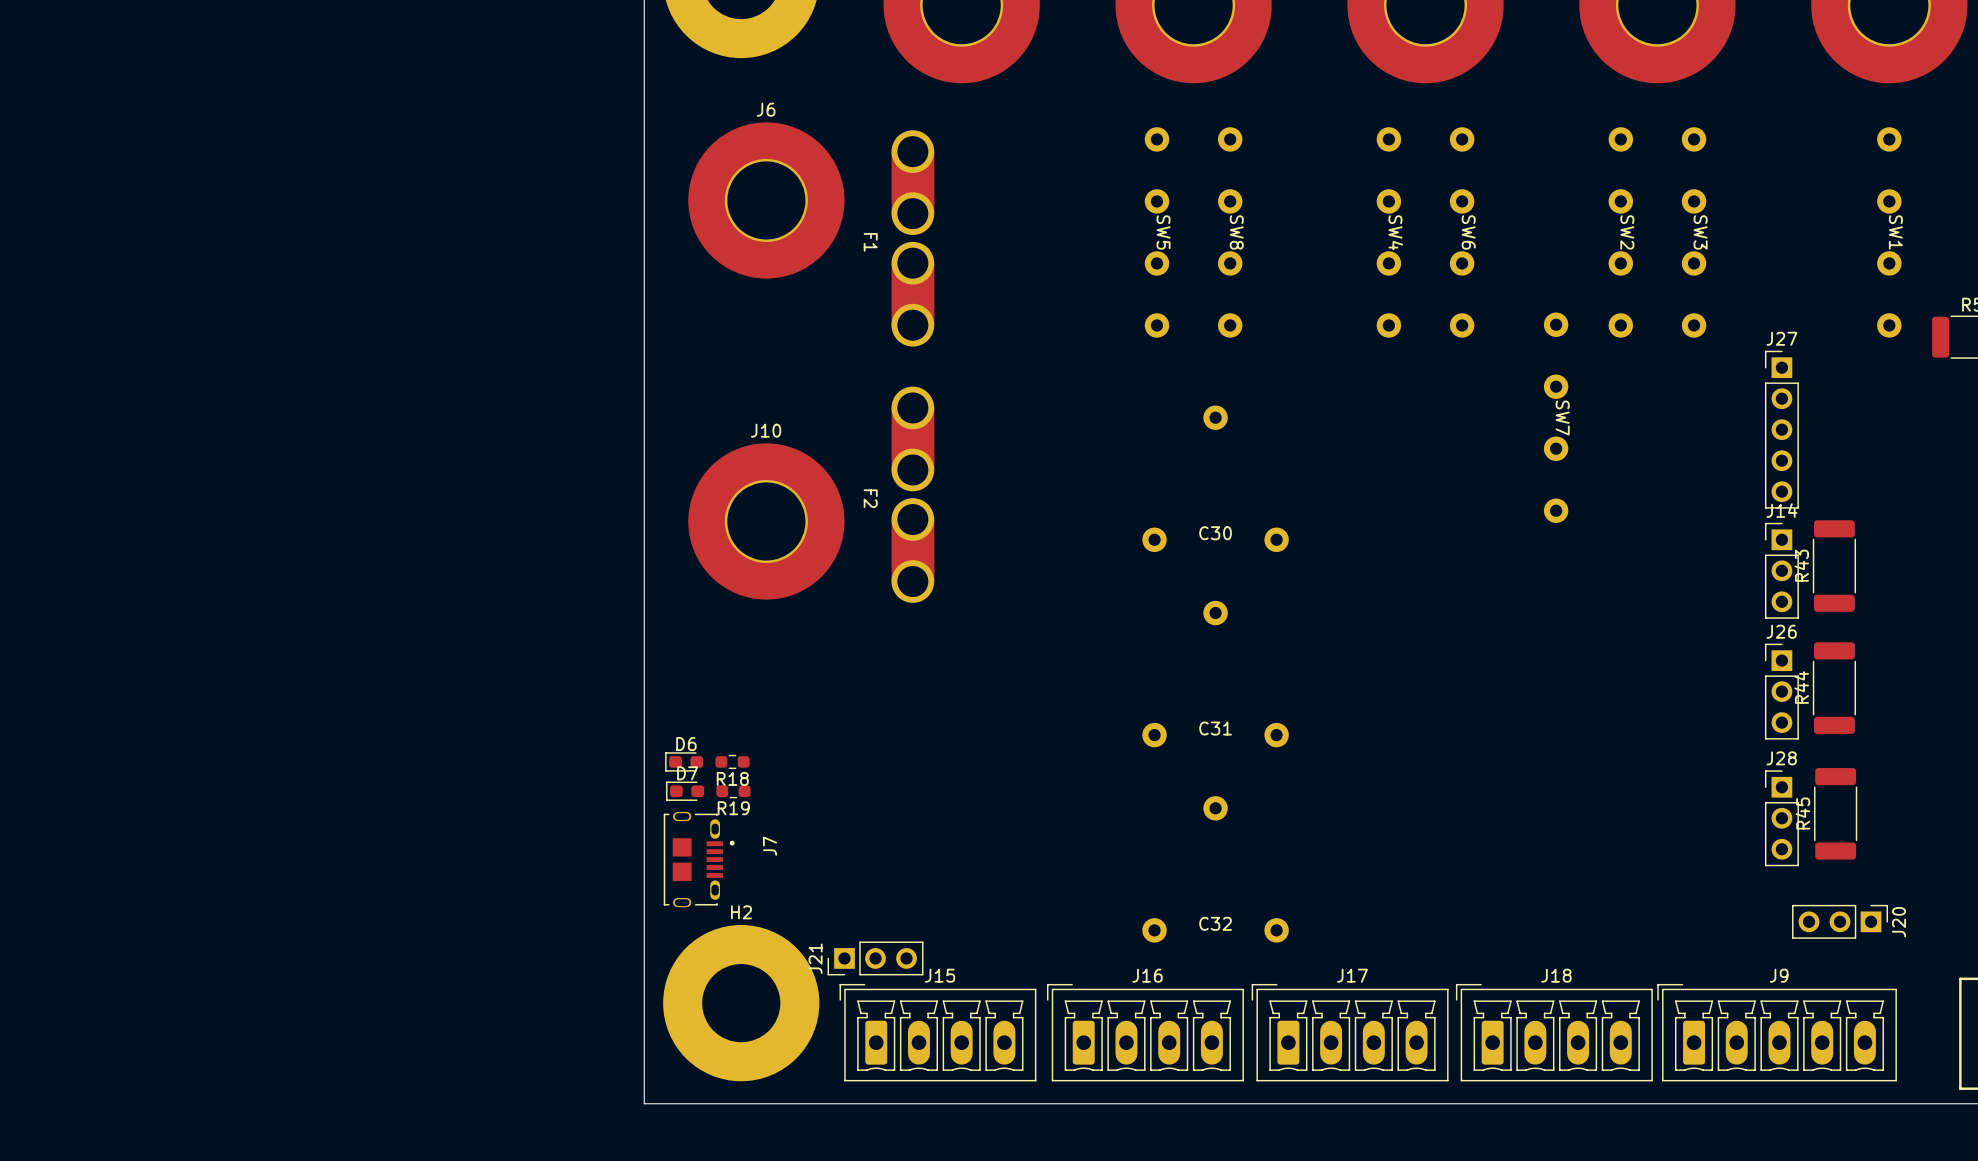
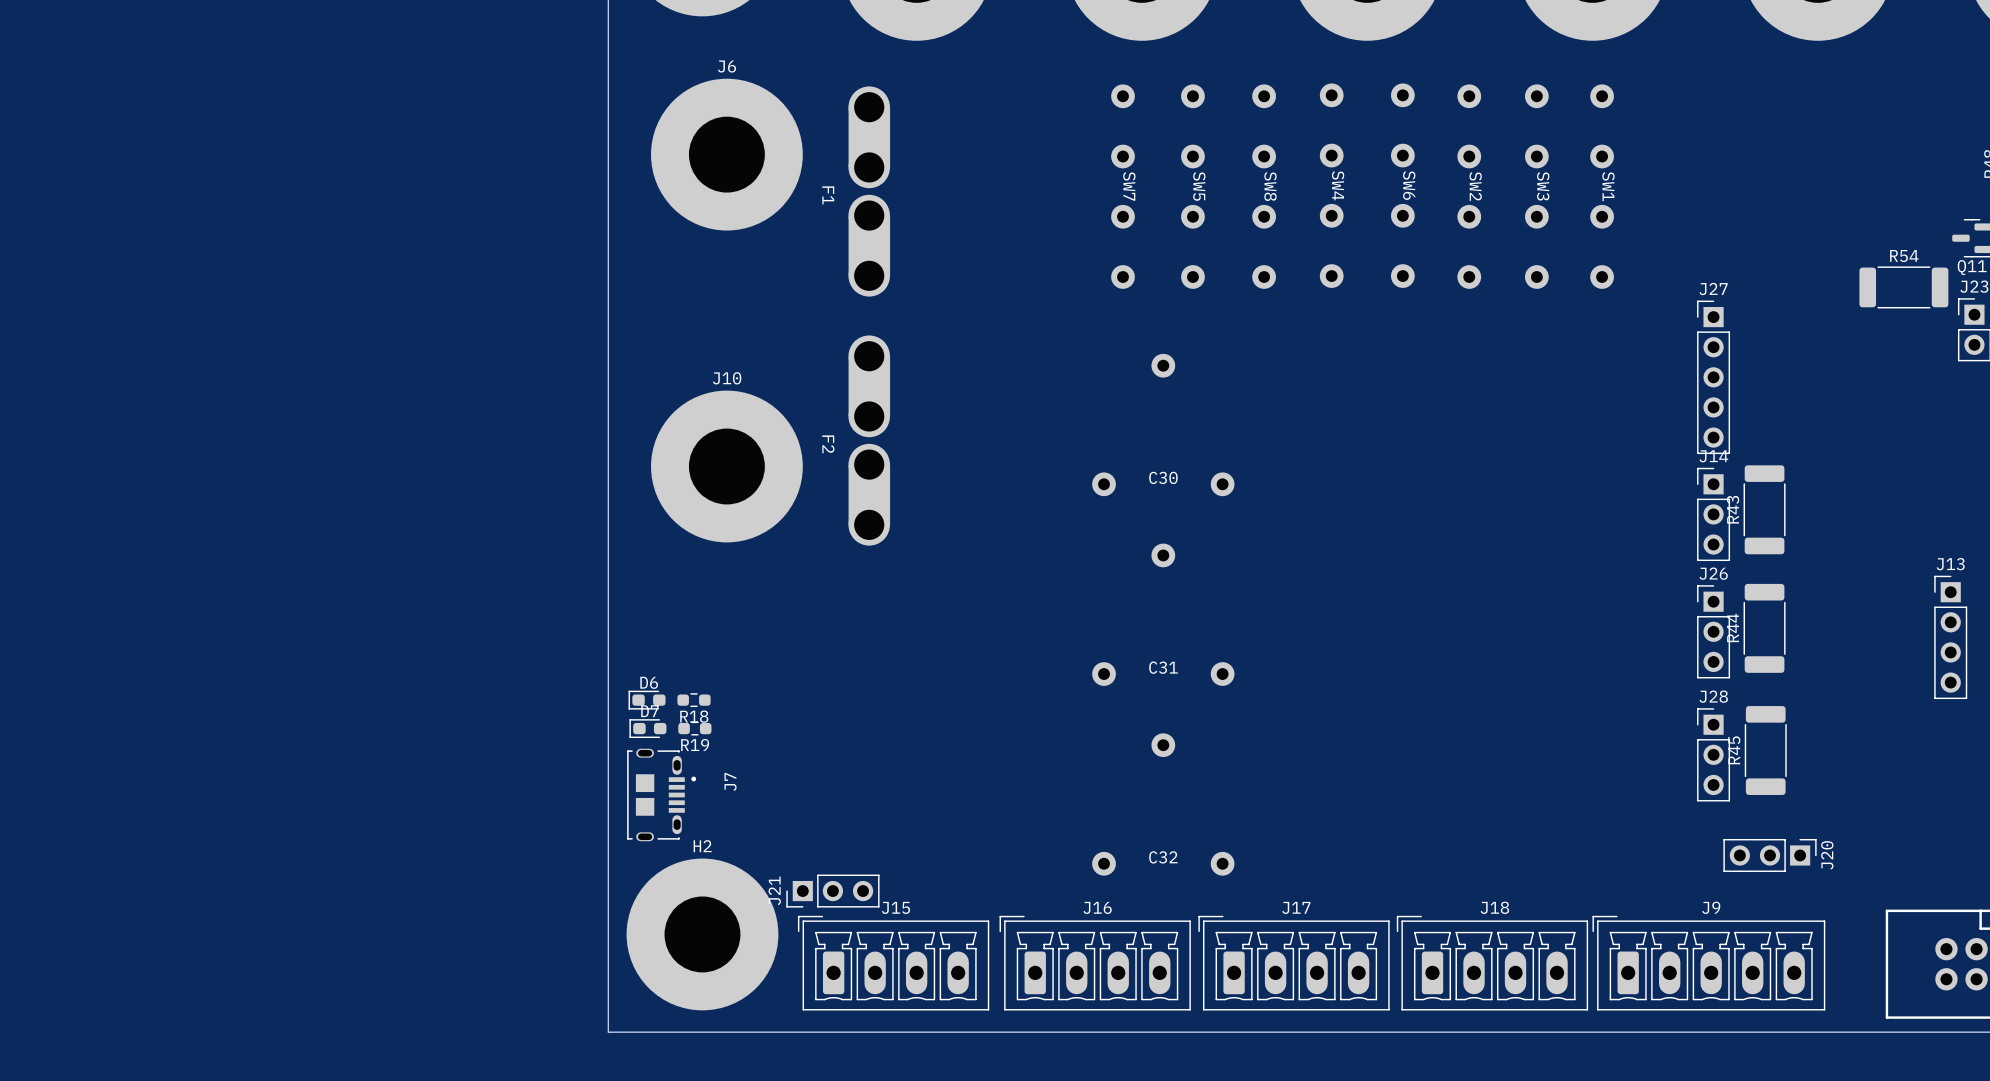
SW5 position: (1156, 232) -> (1192, 186)
SW8 position: (1230, 232) -> (1264, 186)
SW2 position: (1620, 232) -> (1469, 186)
SW3 position: (1694, 232) -> (1536, 186)
SW1 position: (1889, 232) -> (1602, 186)
SW7 position: (1556, 417) -> (1122, 186)

